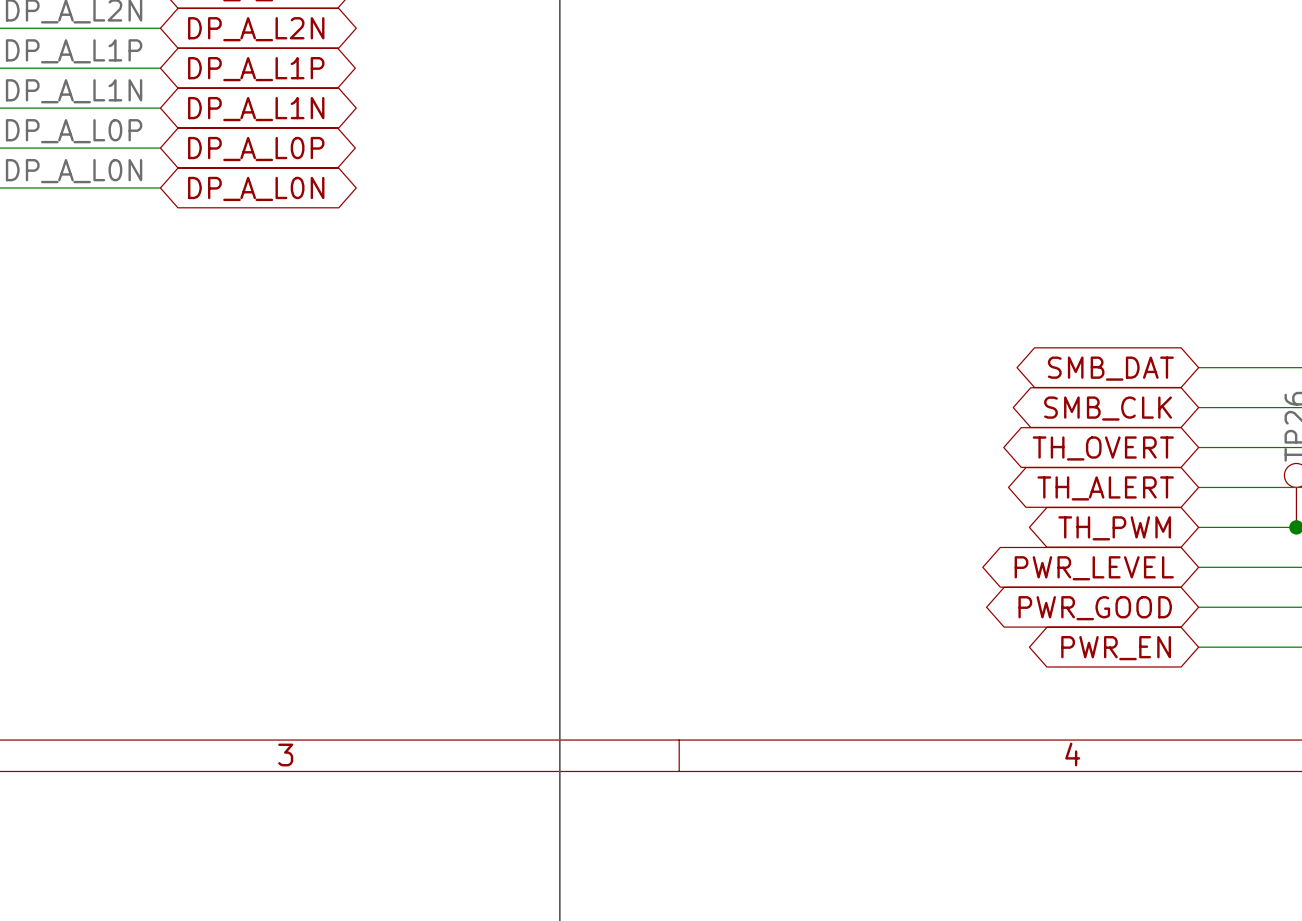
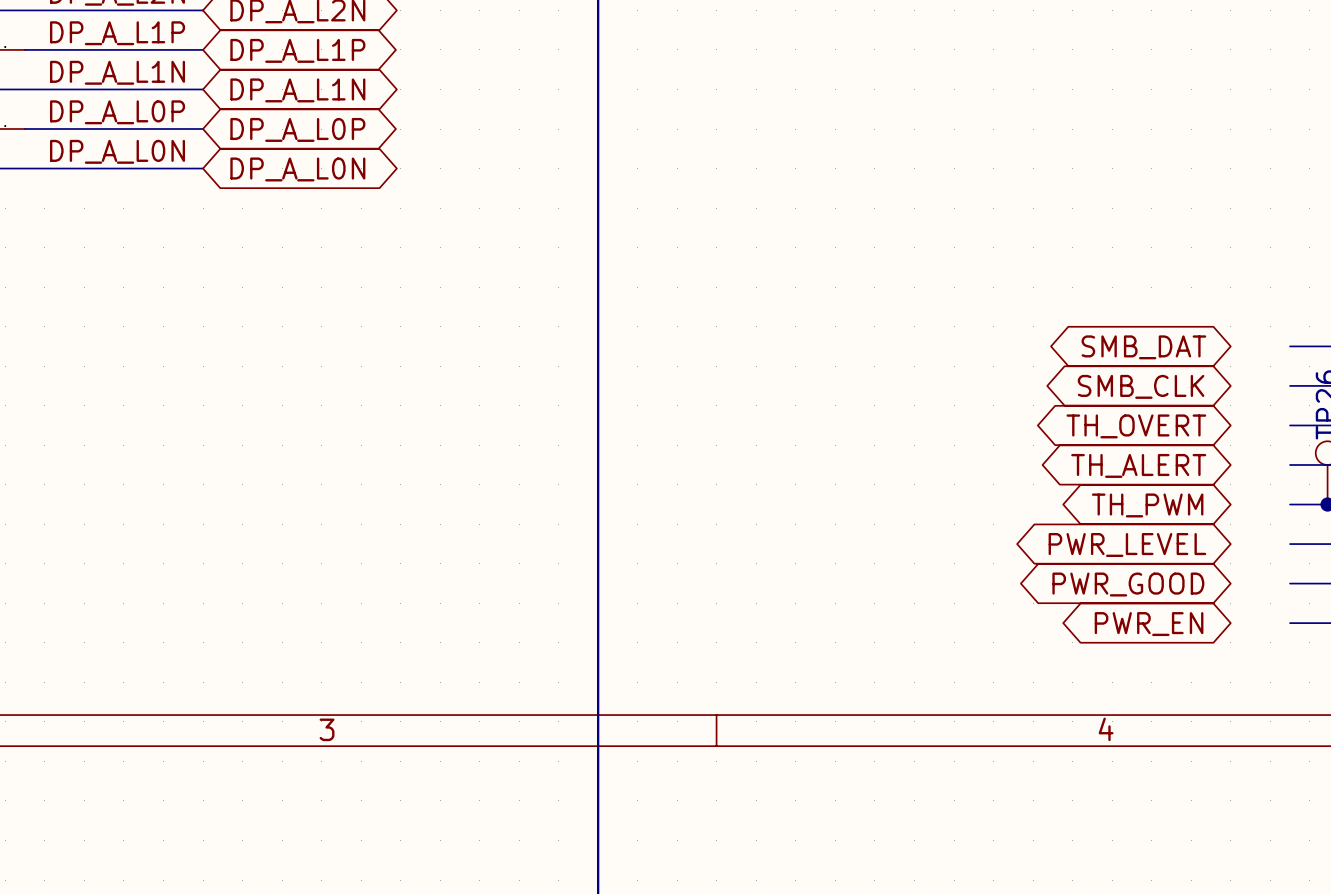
wire: (1198, 367) (1258, 367) -> none
wire: (1198, 407) (1258, 407) -> none
wire: (1198, 447) (1258, 447) -> none
wire: (1198, 487) (1258, 487) -> none
wire: (1198, 527) (1258, 527) -> none
wire: (1198, 567) (1258, 567) -> none
wire: (1198, 607) (1258, 607) -> none
wire: (1198, 647) (1258, 647) -> none

